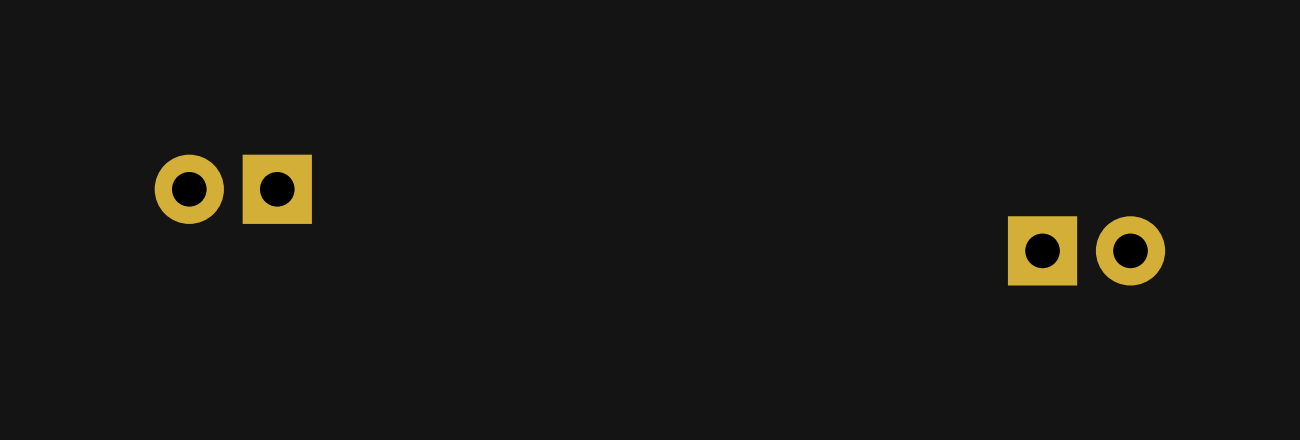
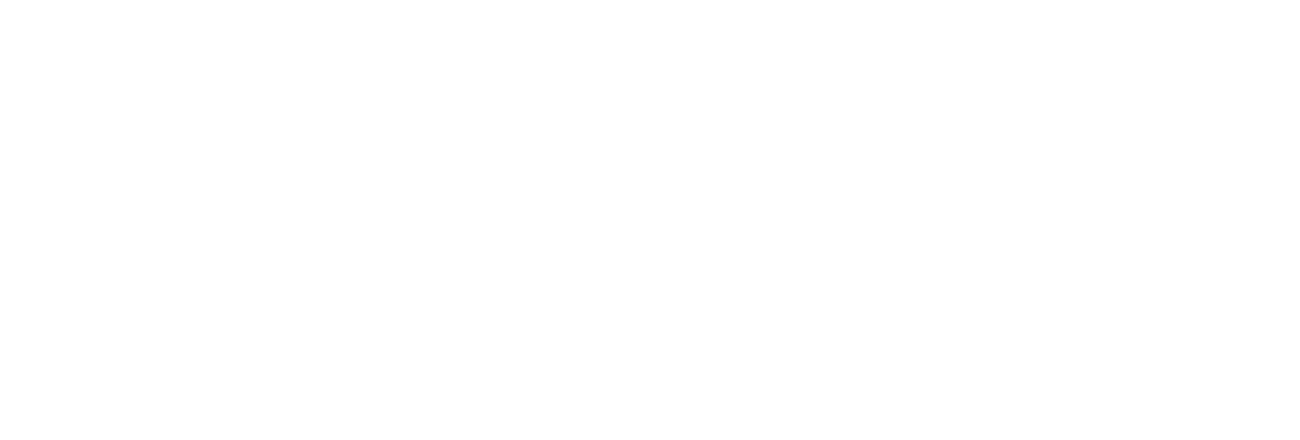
part: (233, 189) -> none
part: (1086, 250) -> none

